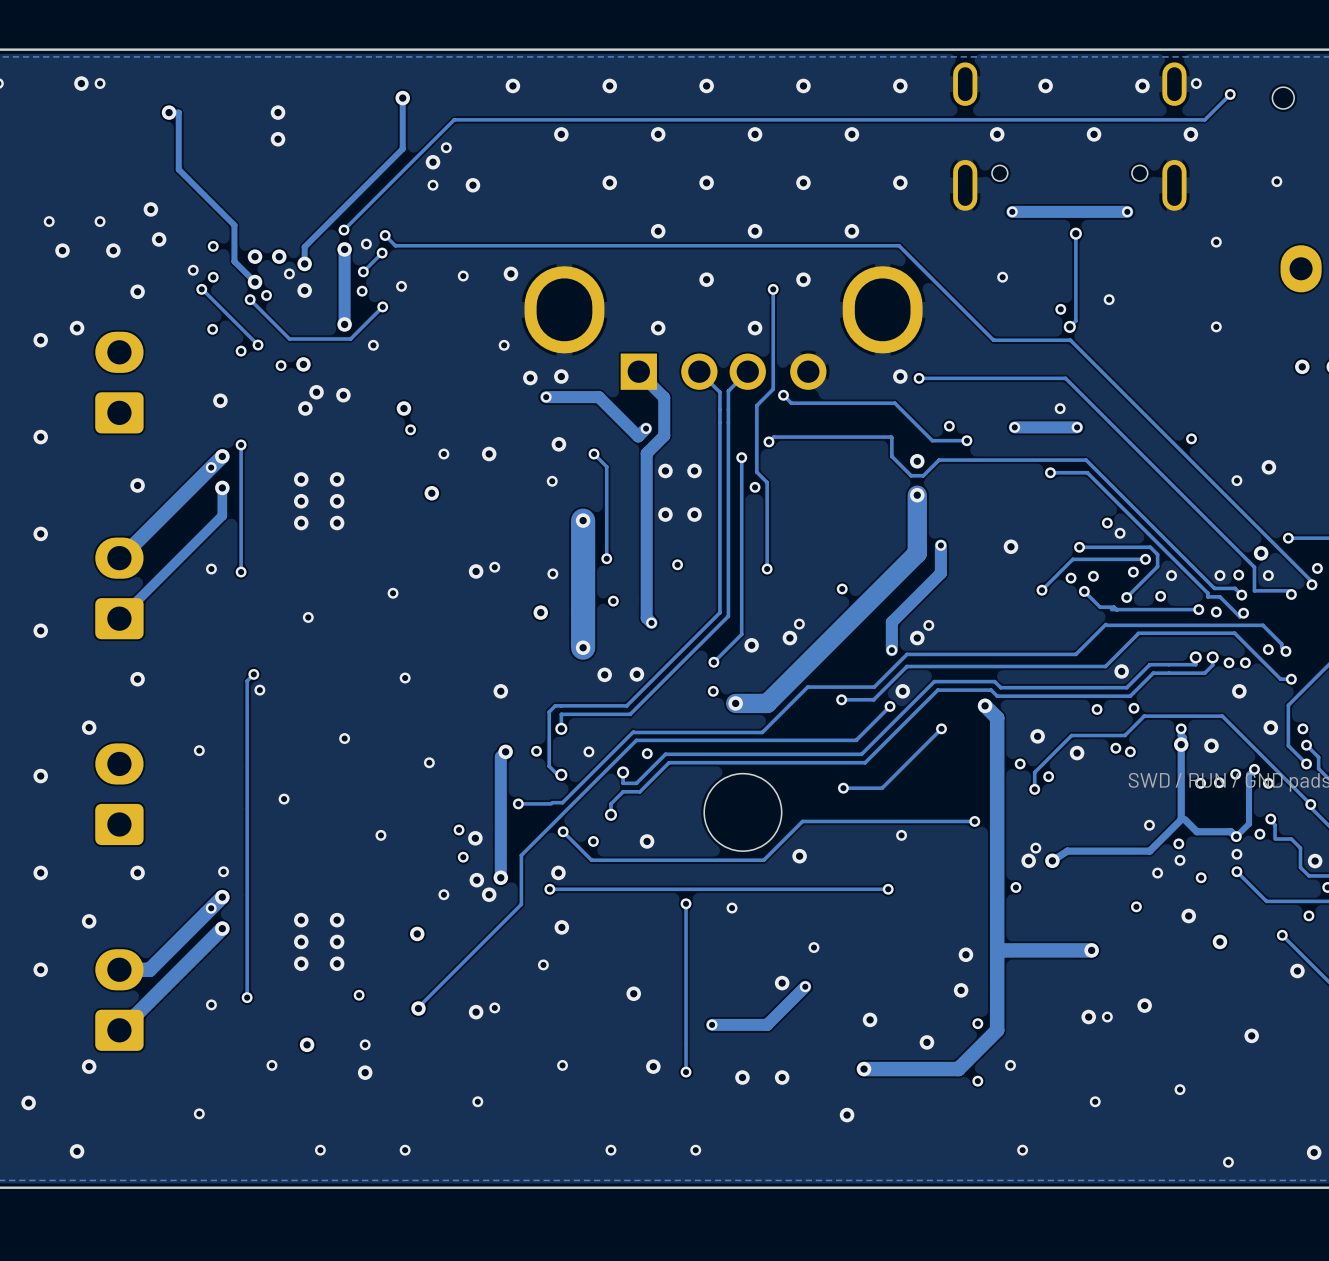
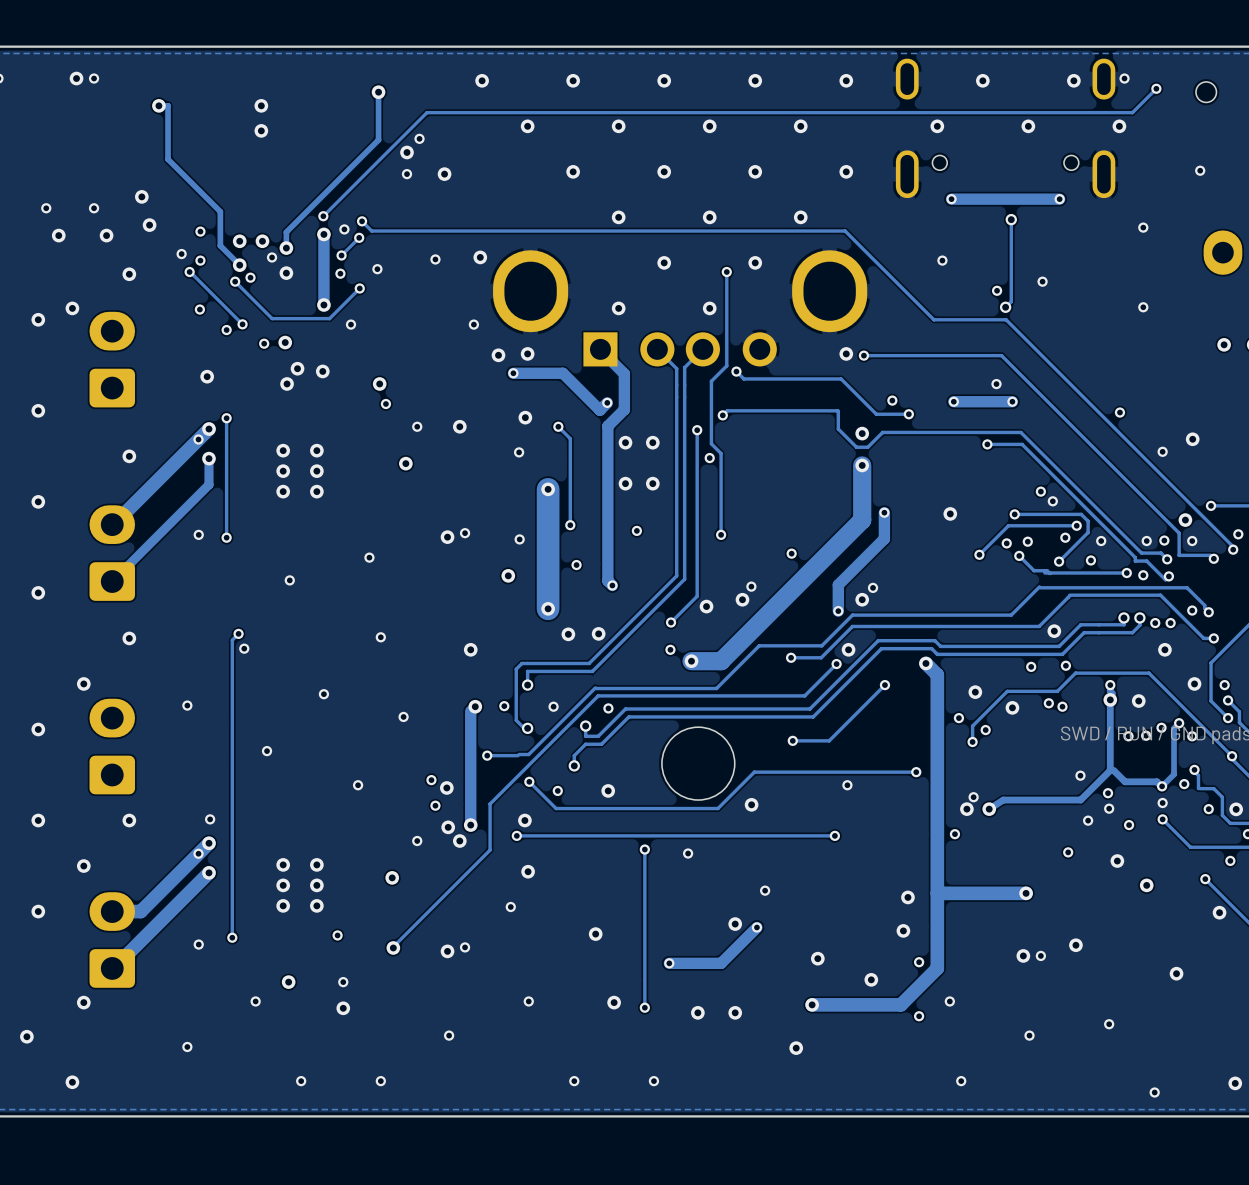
via: none -> (1208, 809)

